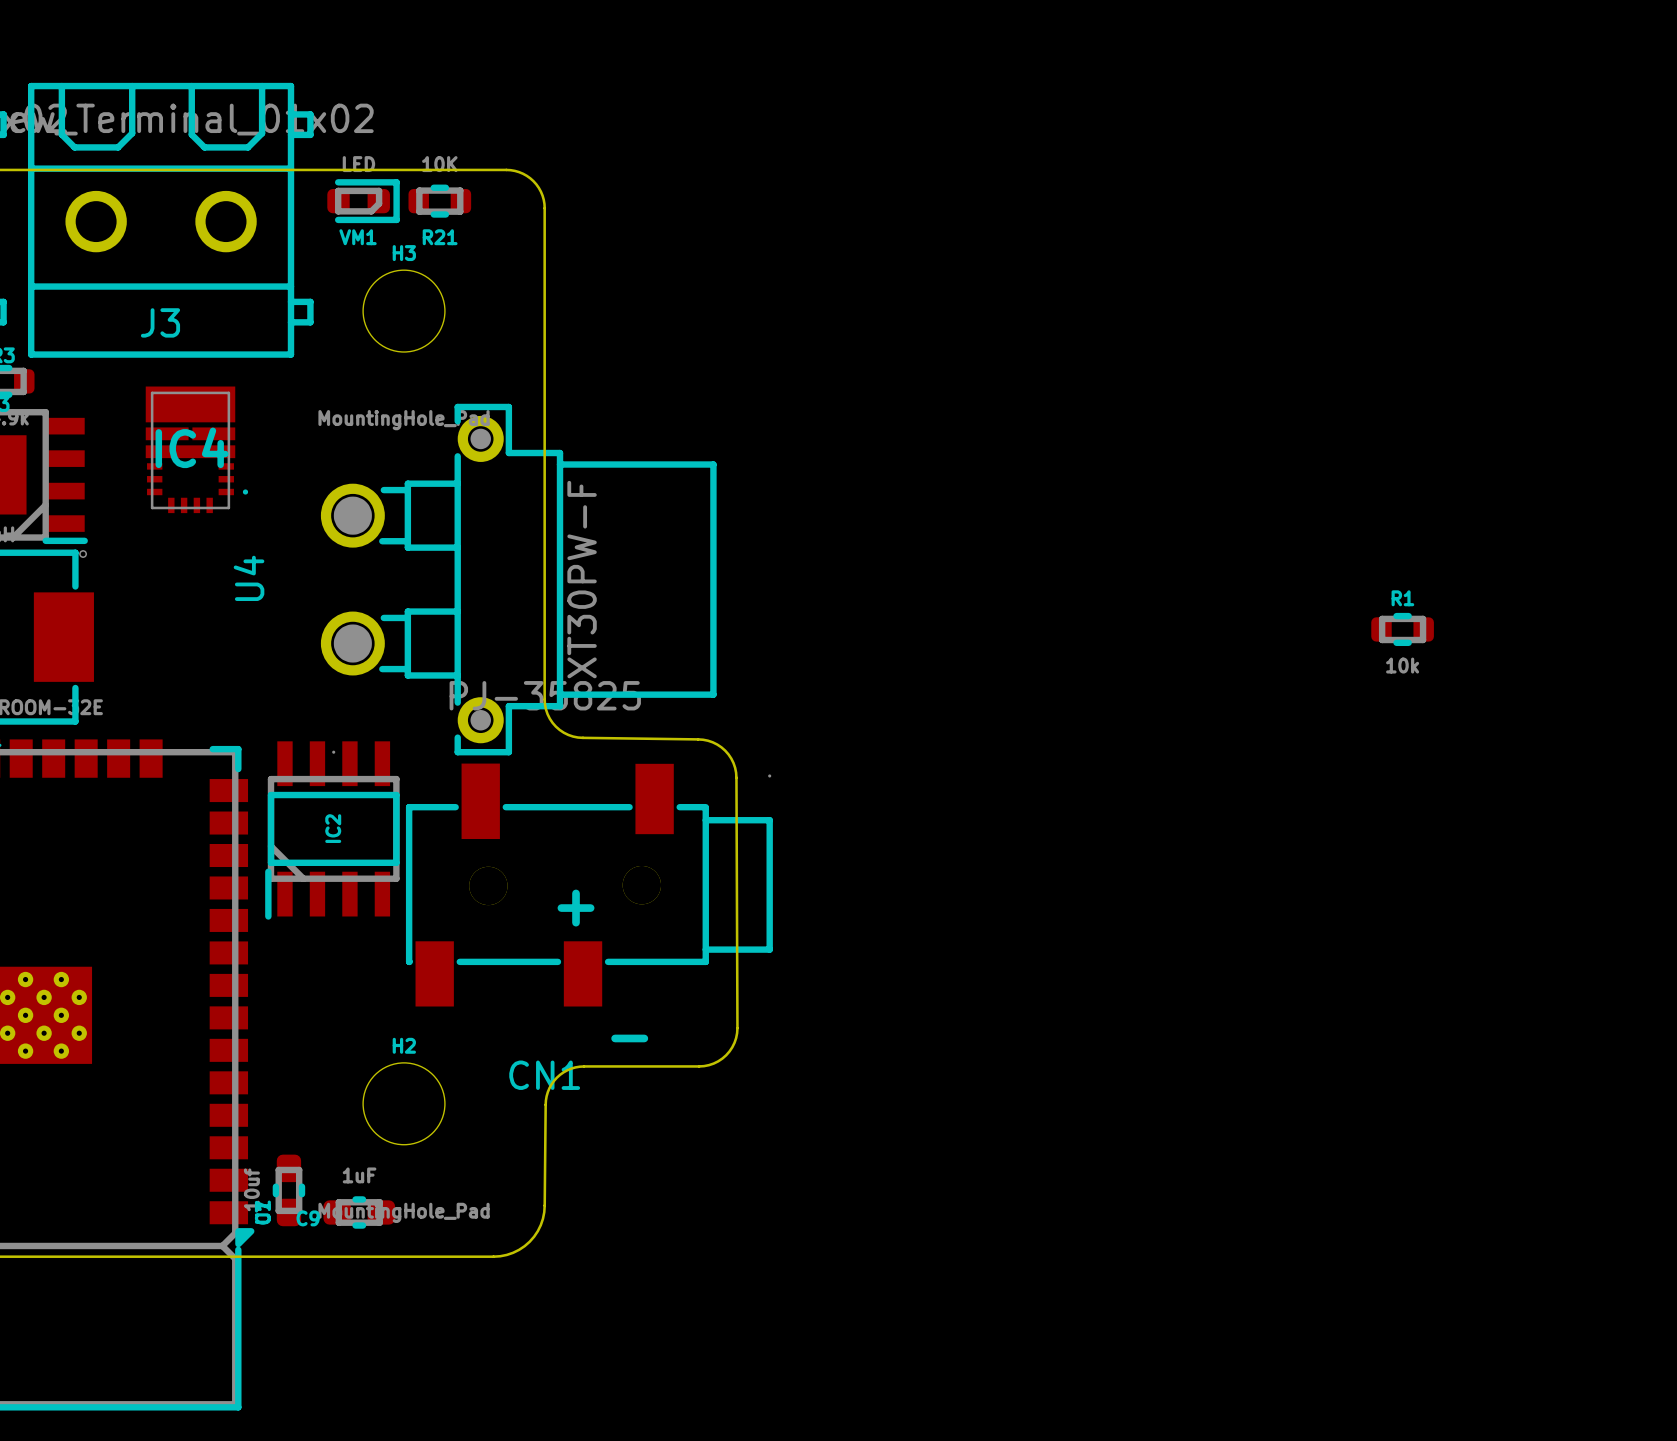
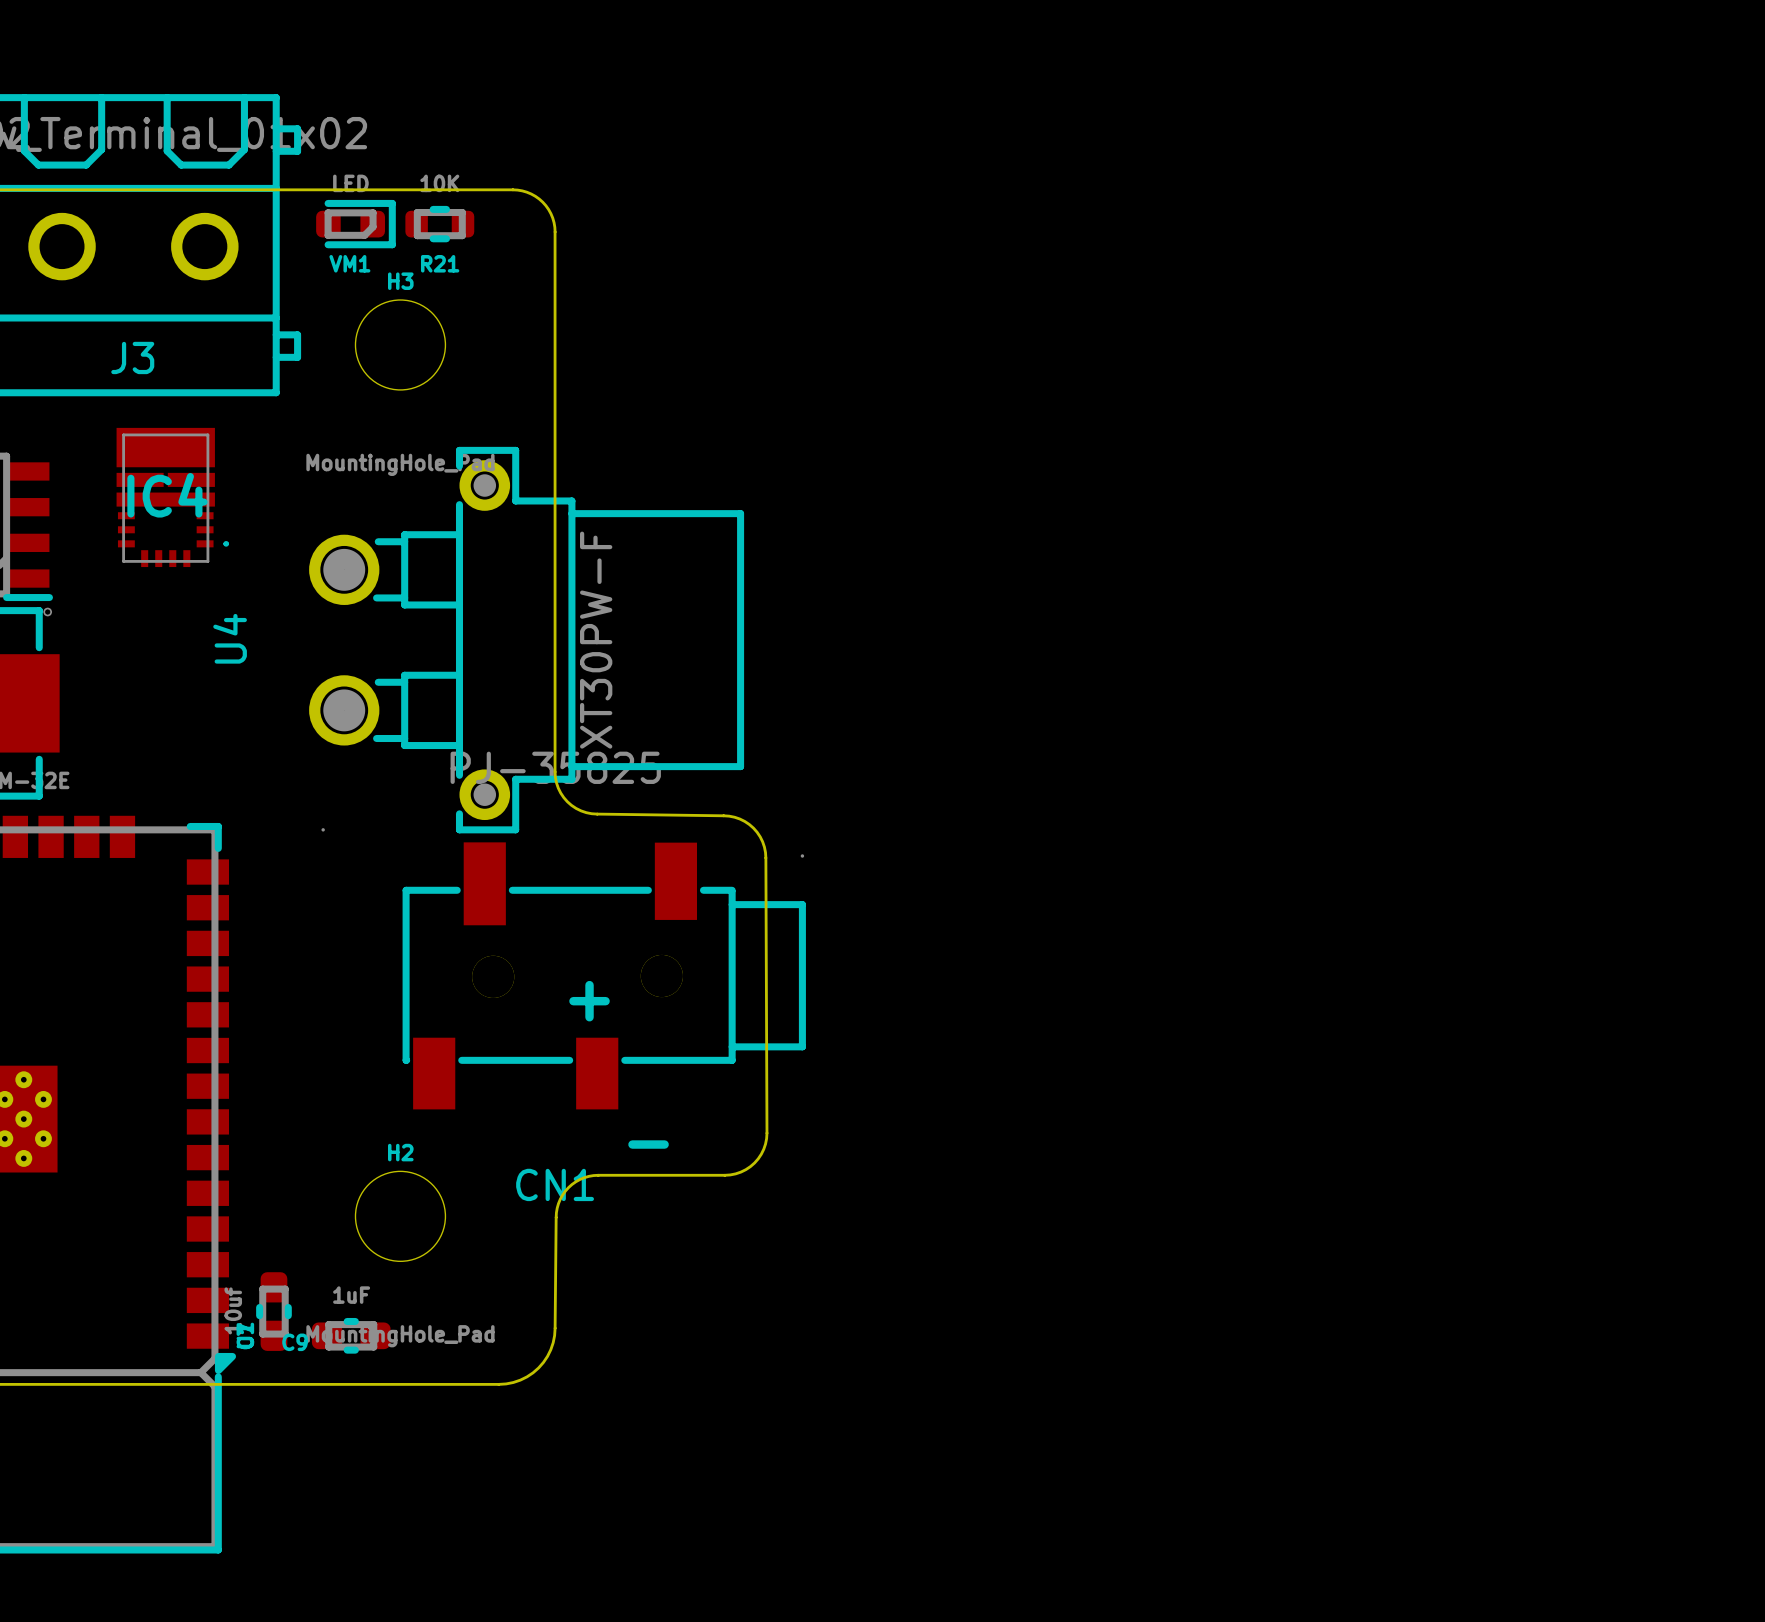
R1: 10k (1402, 629) -> none
IC2: (332, 830) -> none

